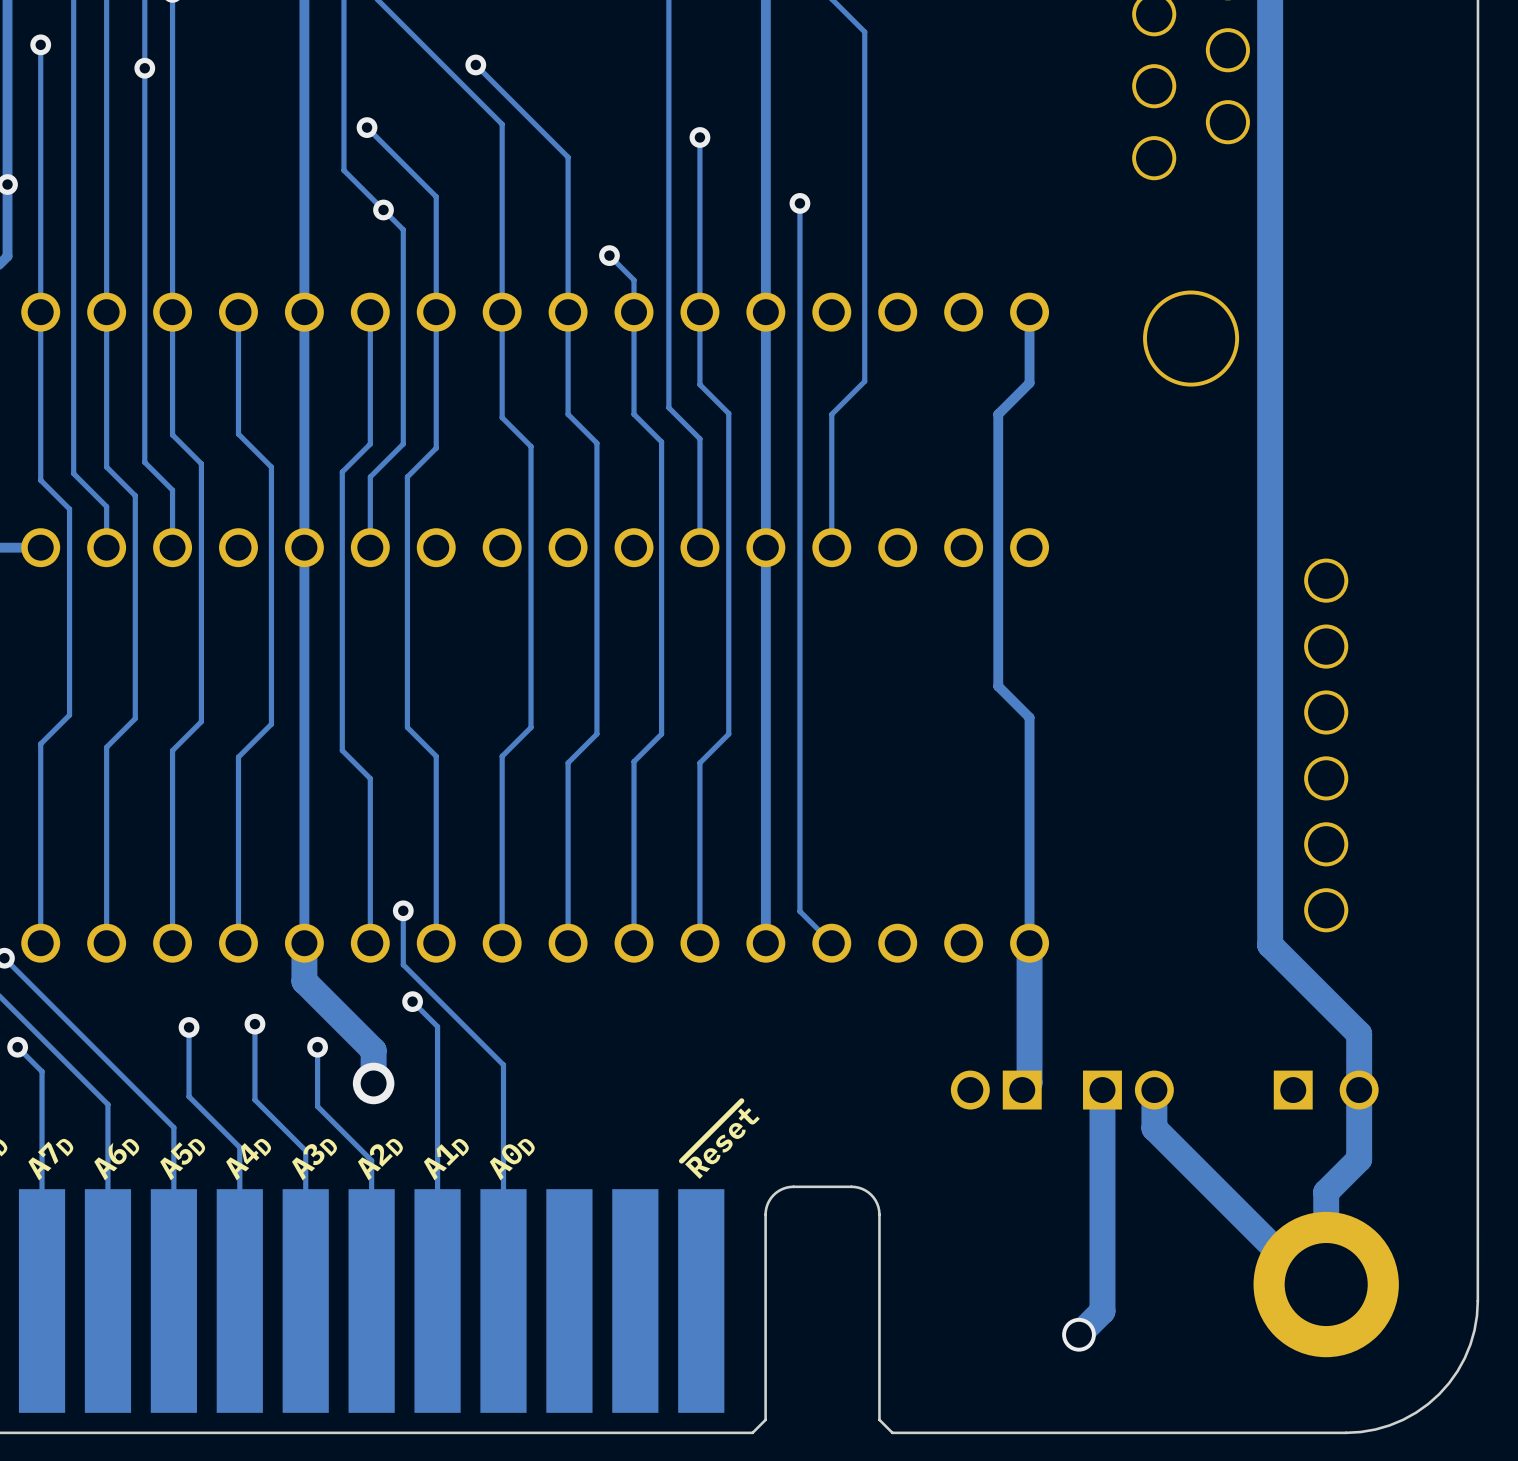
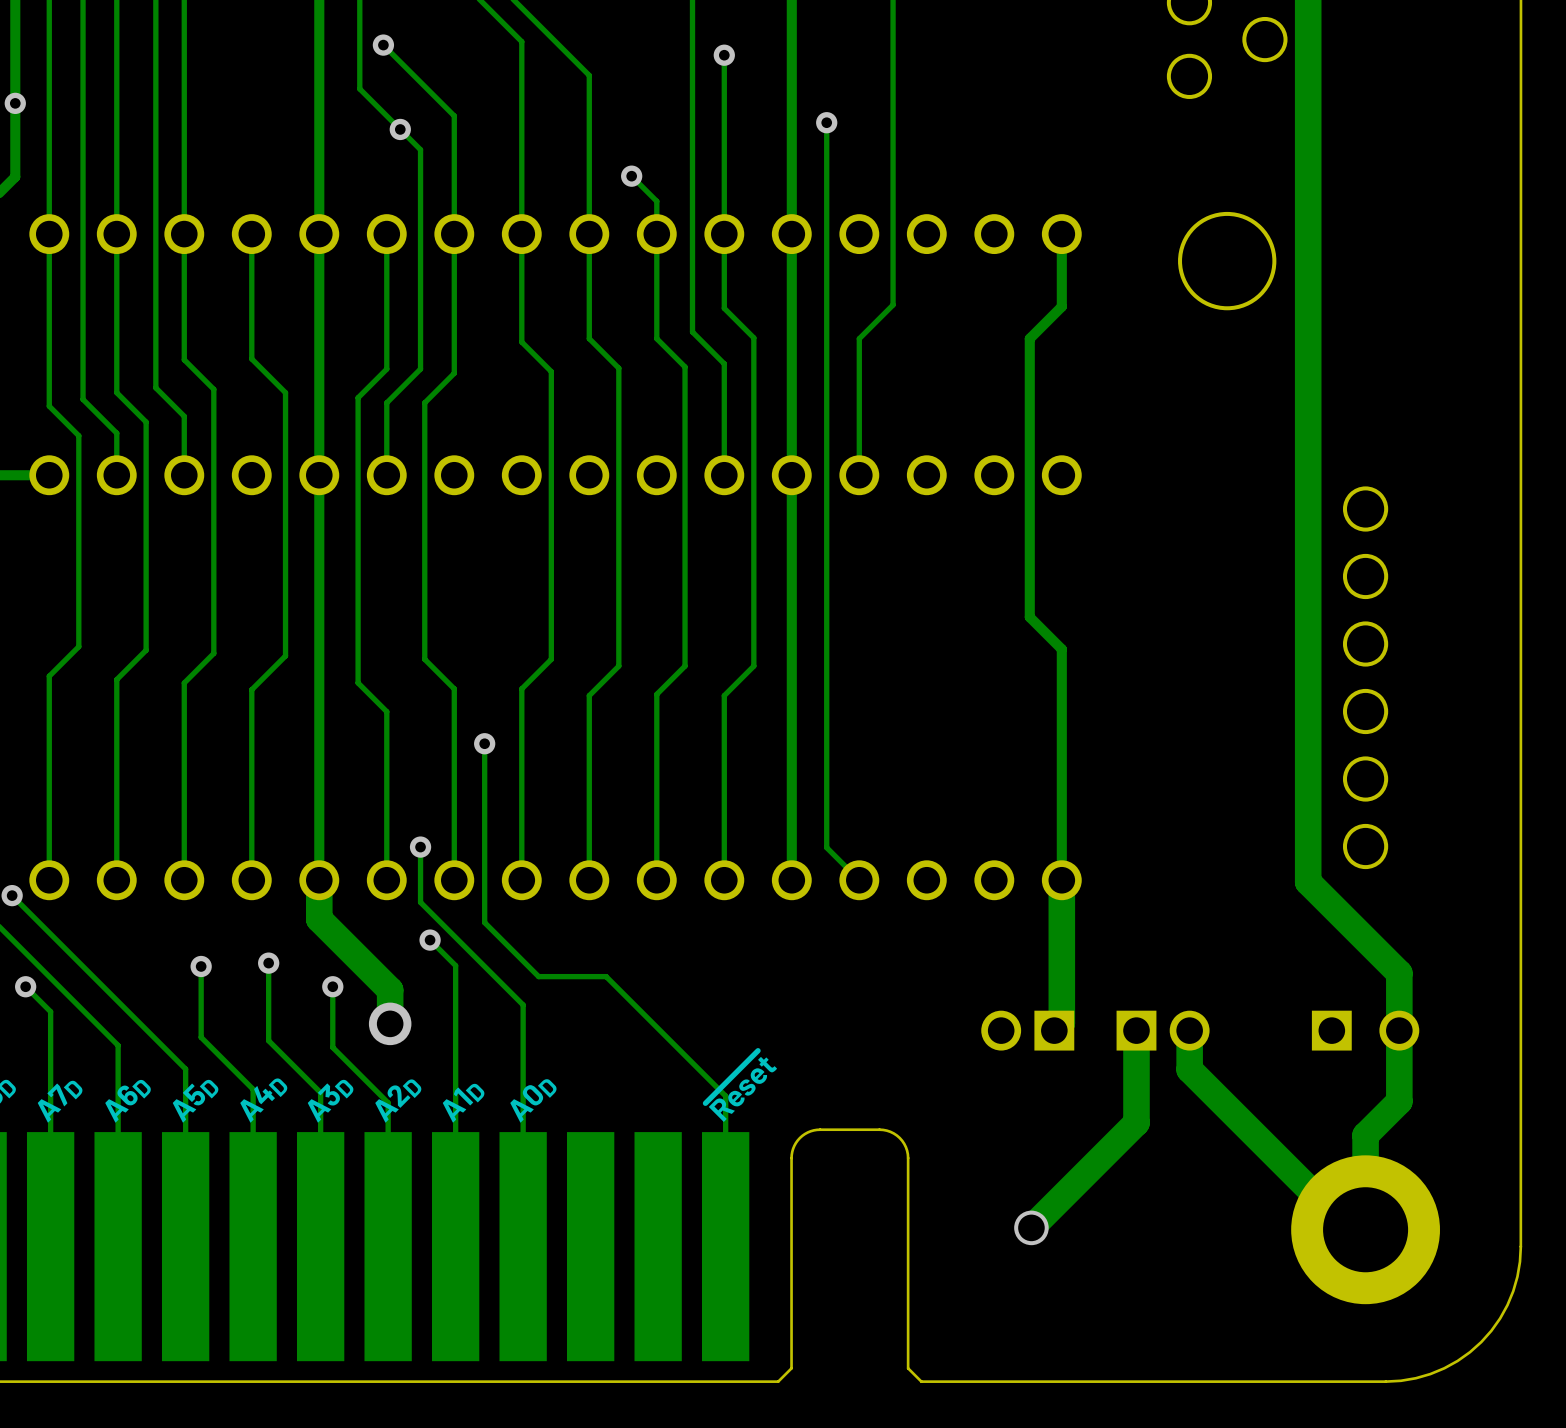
track: none -> (484, 743) (484, 922) (538, 976) (606, 976) (725, 1096) (725, 1246)
via: none -> (484, 743)
track: (1102, 1180) (1102, 1311) (1078, 1334) -> (1136, 1122) (1031, 1227)
via position: (1078, 1334) -> (1031, 1227)

